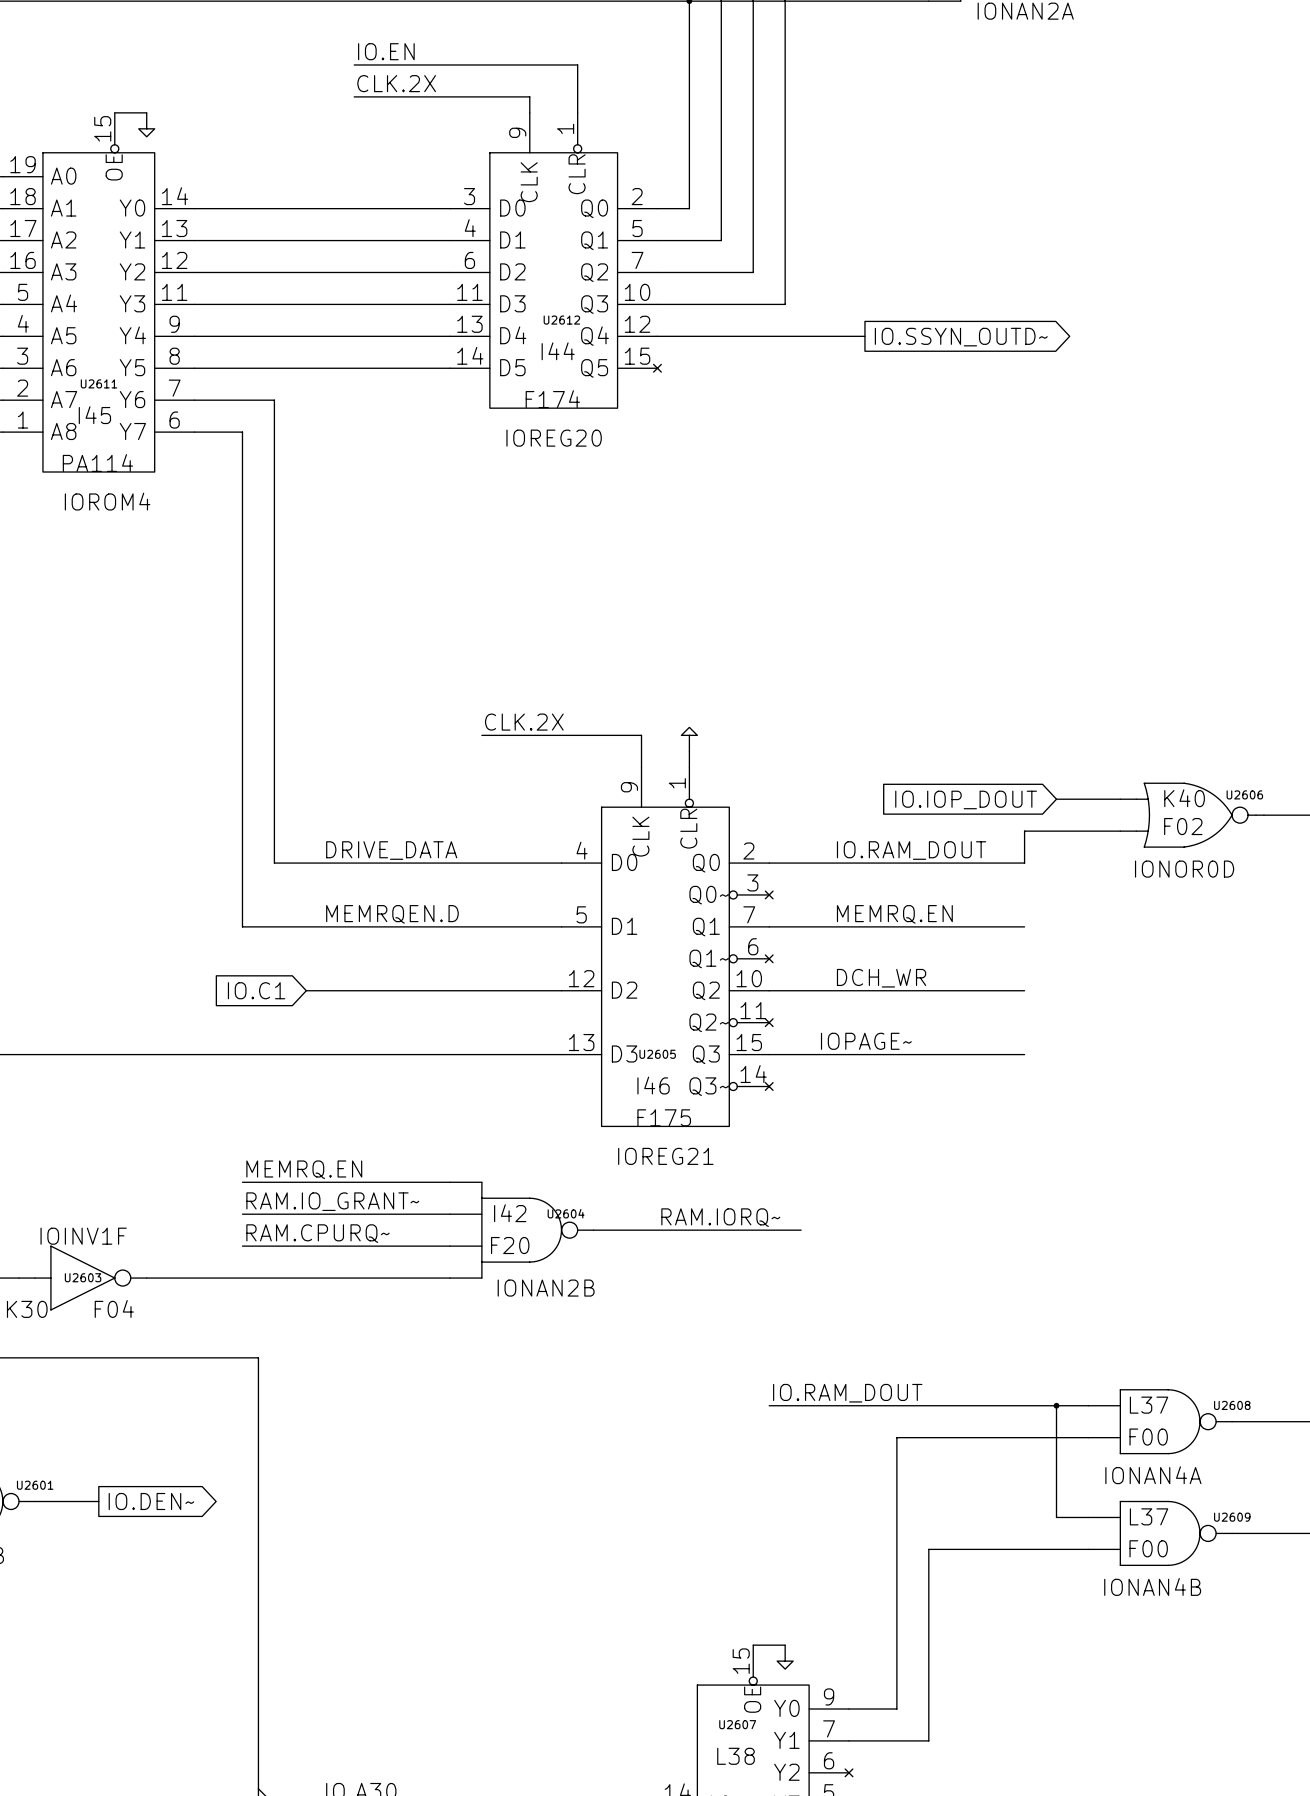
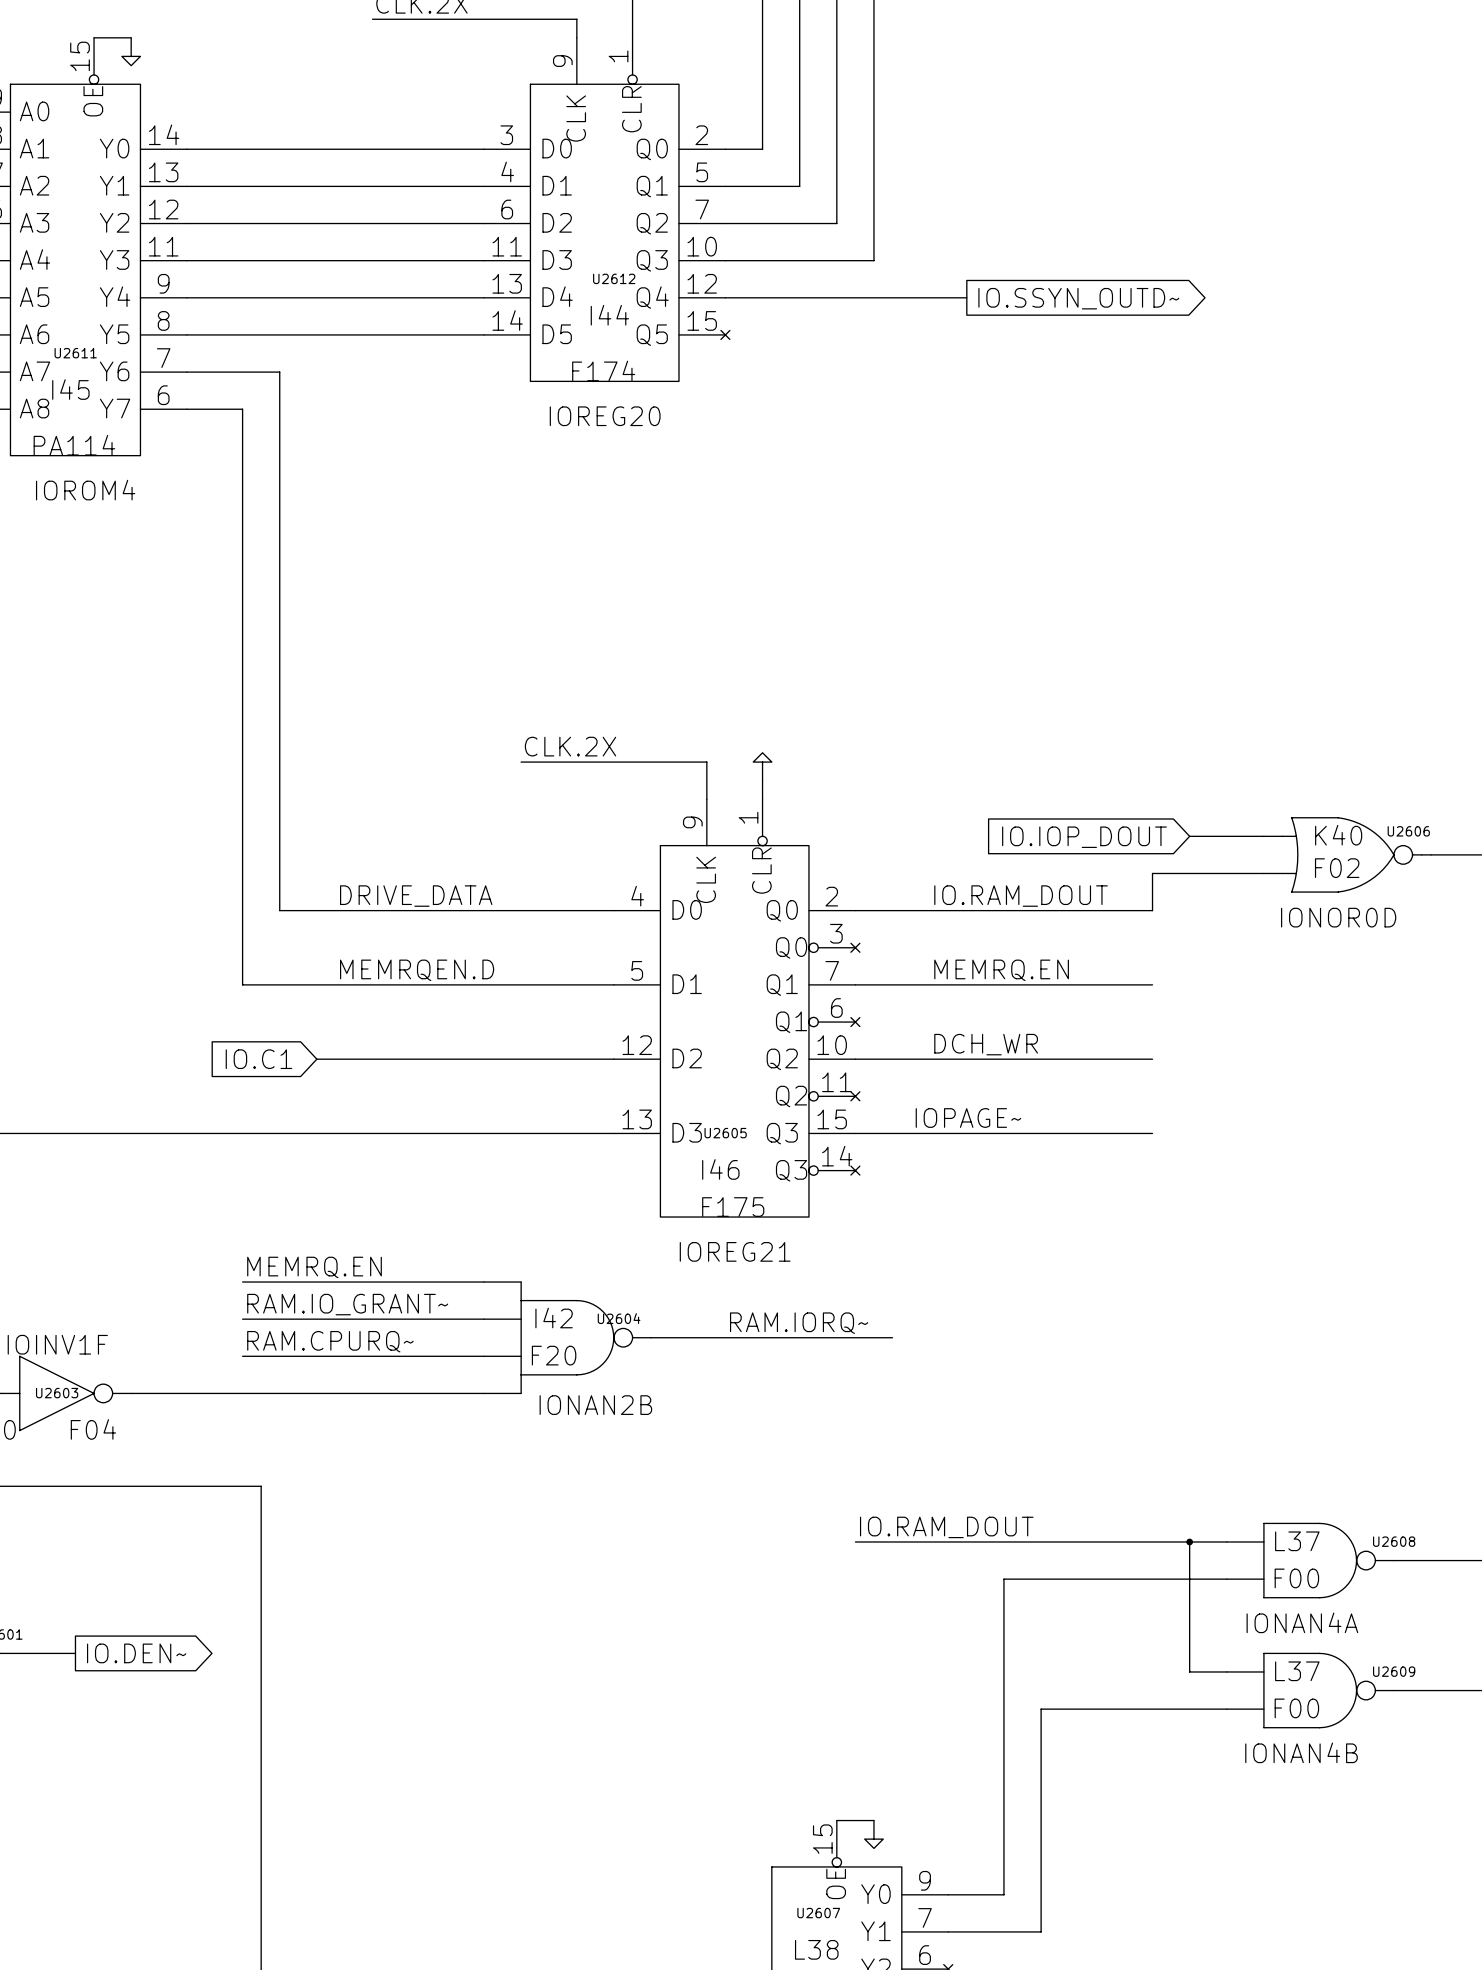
U2605 pin name: Q0~ (708, 895) -> Q0 (791, 947)
U2605 pin name: Q1~ (708, 958) -> Q1 (791, 1022)
U2605 pin name: Q2~ (708, 1022) -> Q2 (791, 1096)
U2605 pin name: Q3~ (708, 1086) -> Q3 (791, 1170)

